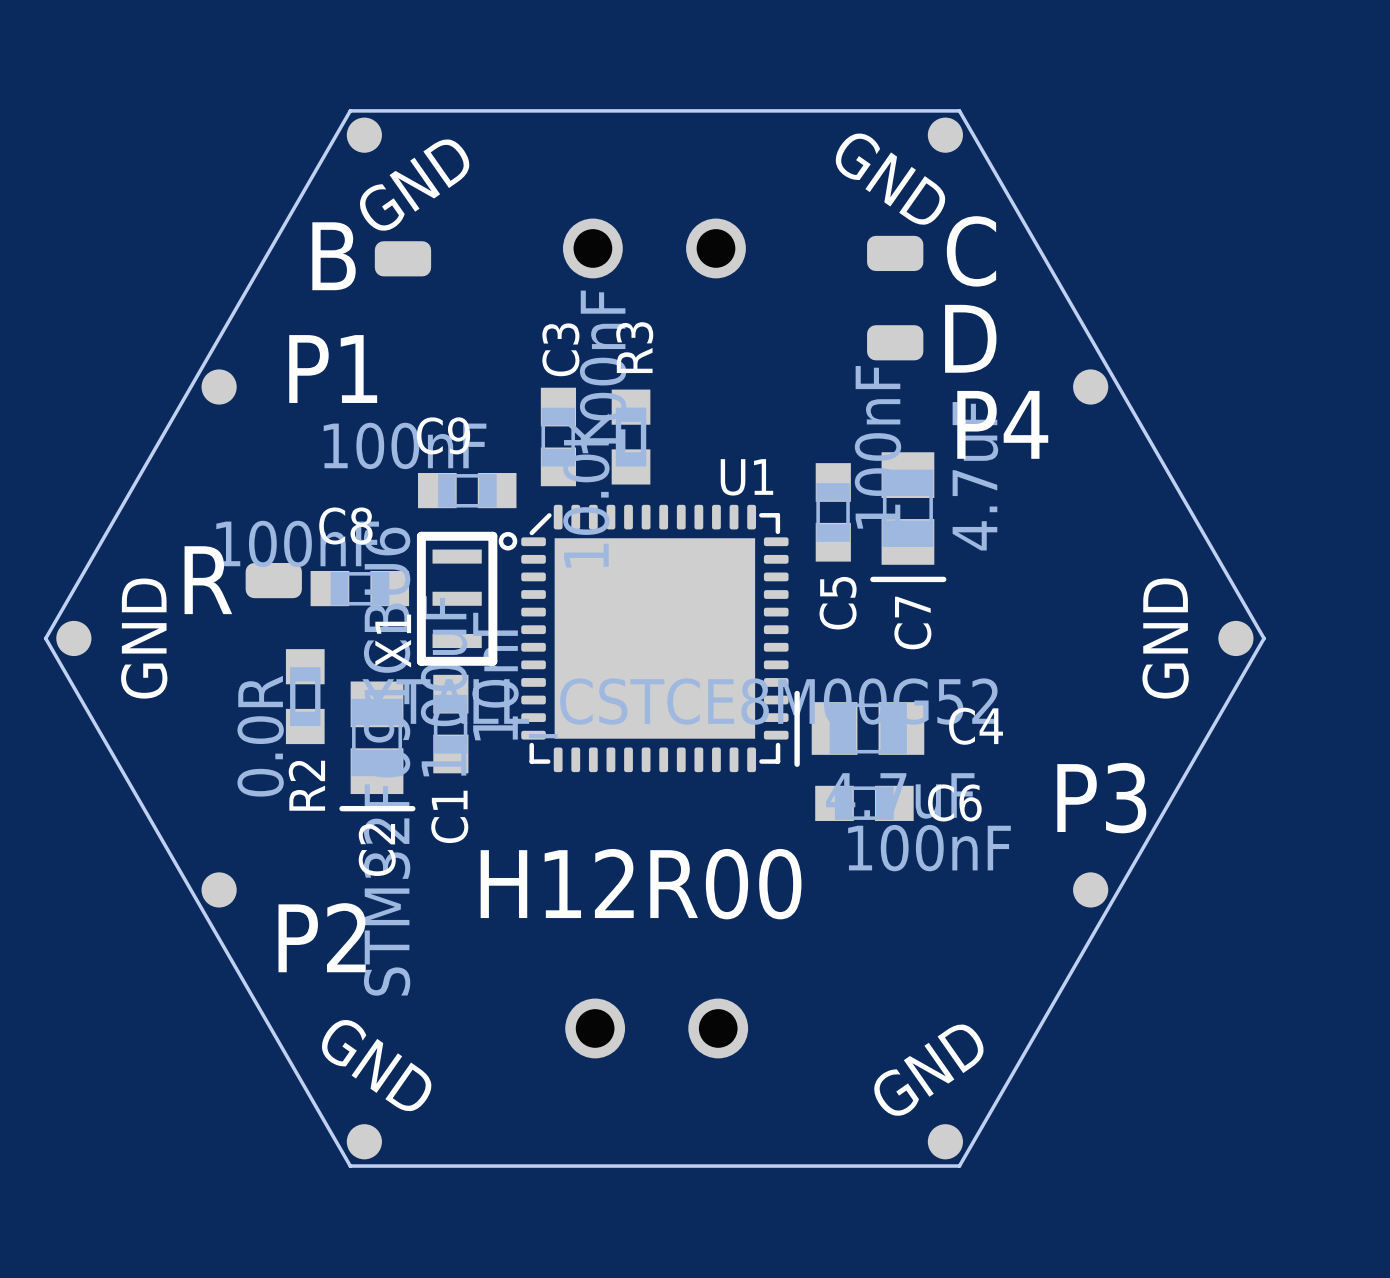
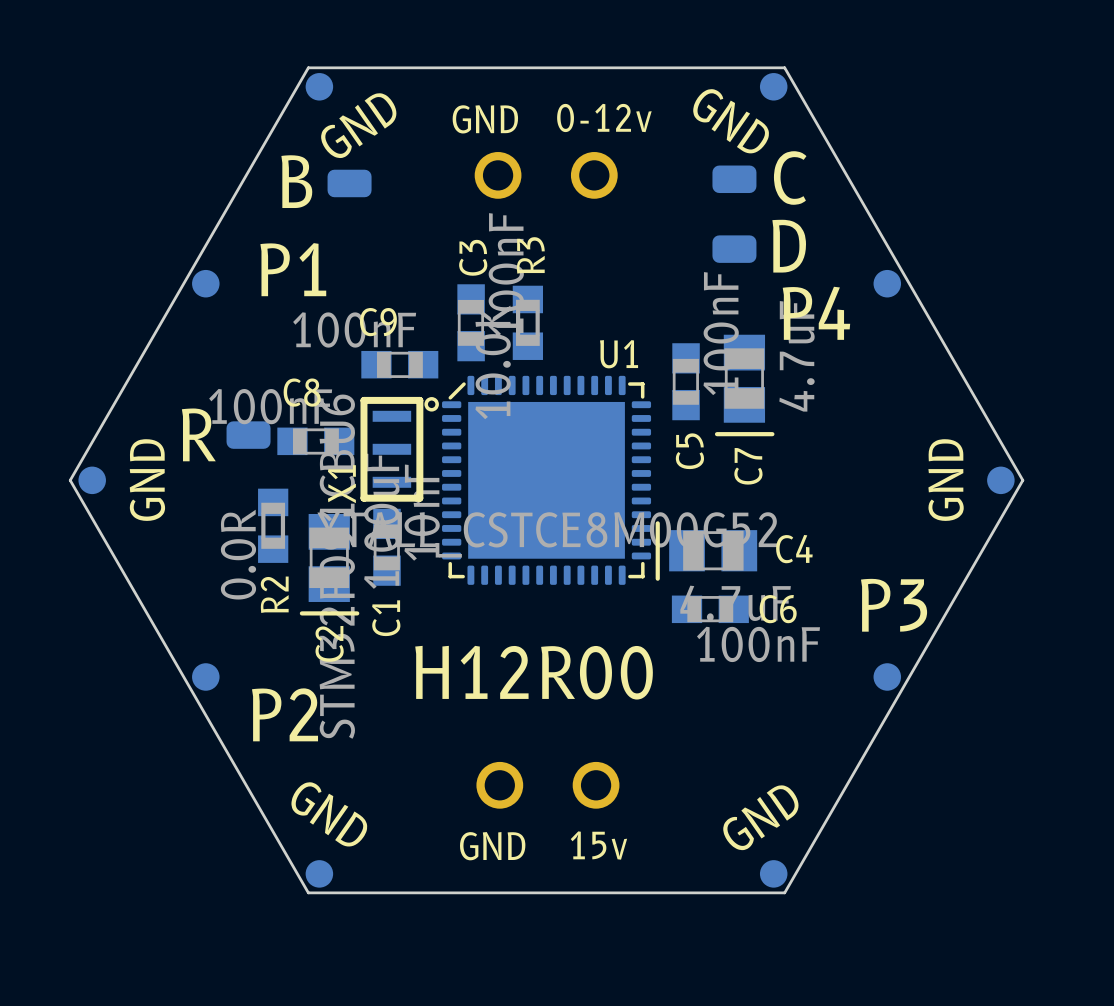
text: none -> 0-12v (604, 117)
text: none -> GND (485, 119)
text: none -> 15v (598, 845)
text: none -> GND (492, 846)

